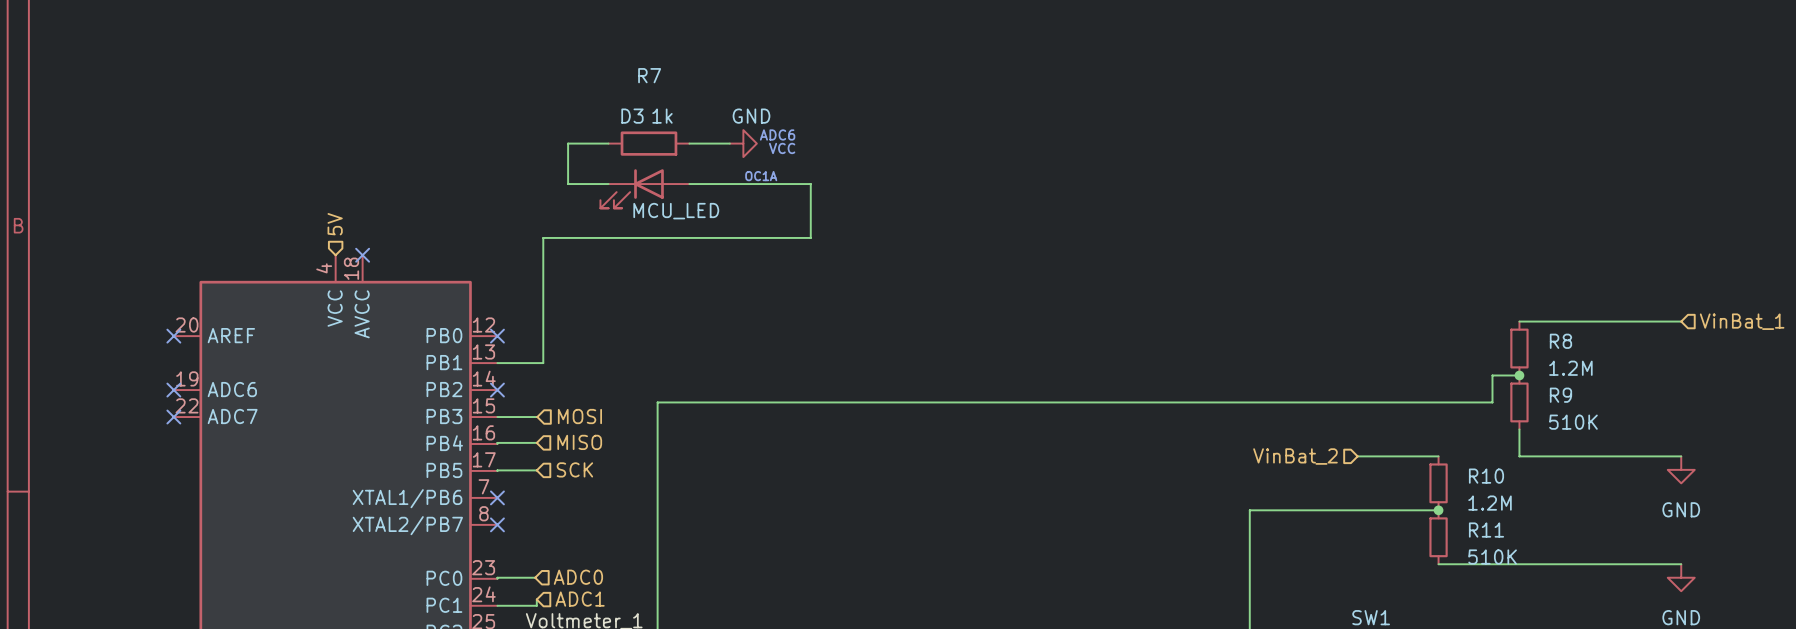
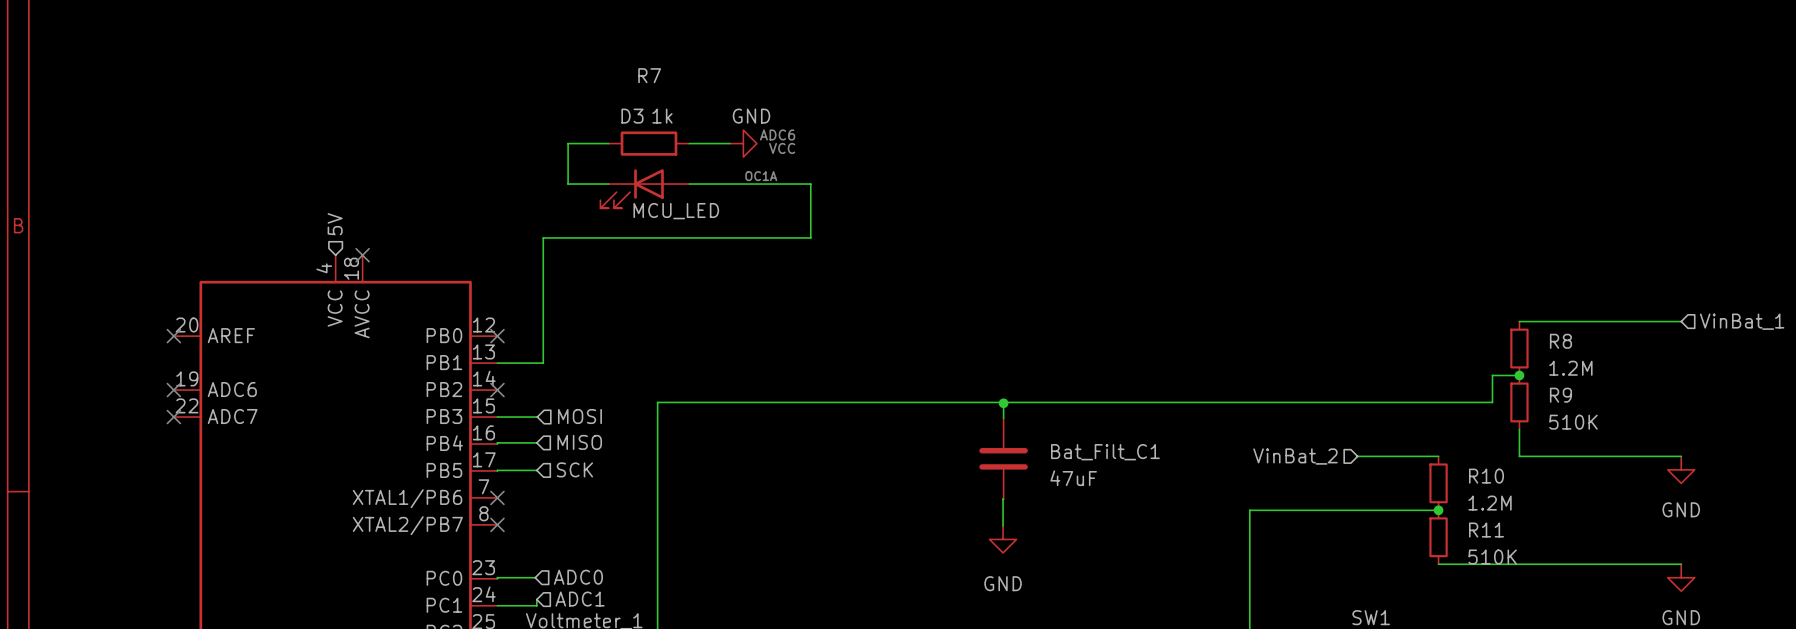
wire: none -> (1003, 402) (1003, 418)
junction: none -> (1003, 403)
Bat_Filt_C1: none -> 47uF (1003, 458)
wire: none -> (1003, 499) (1003, 525)
power symbol: none -> GND (1003, 539)

